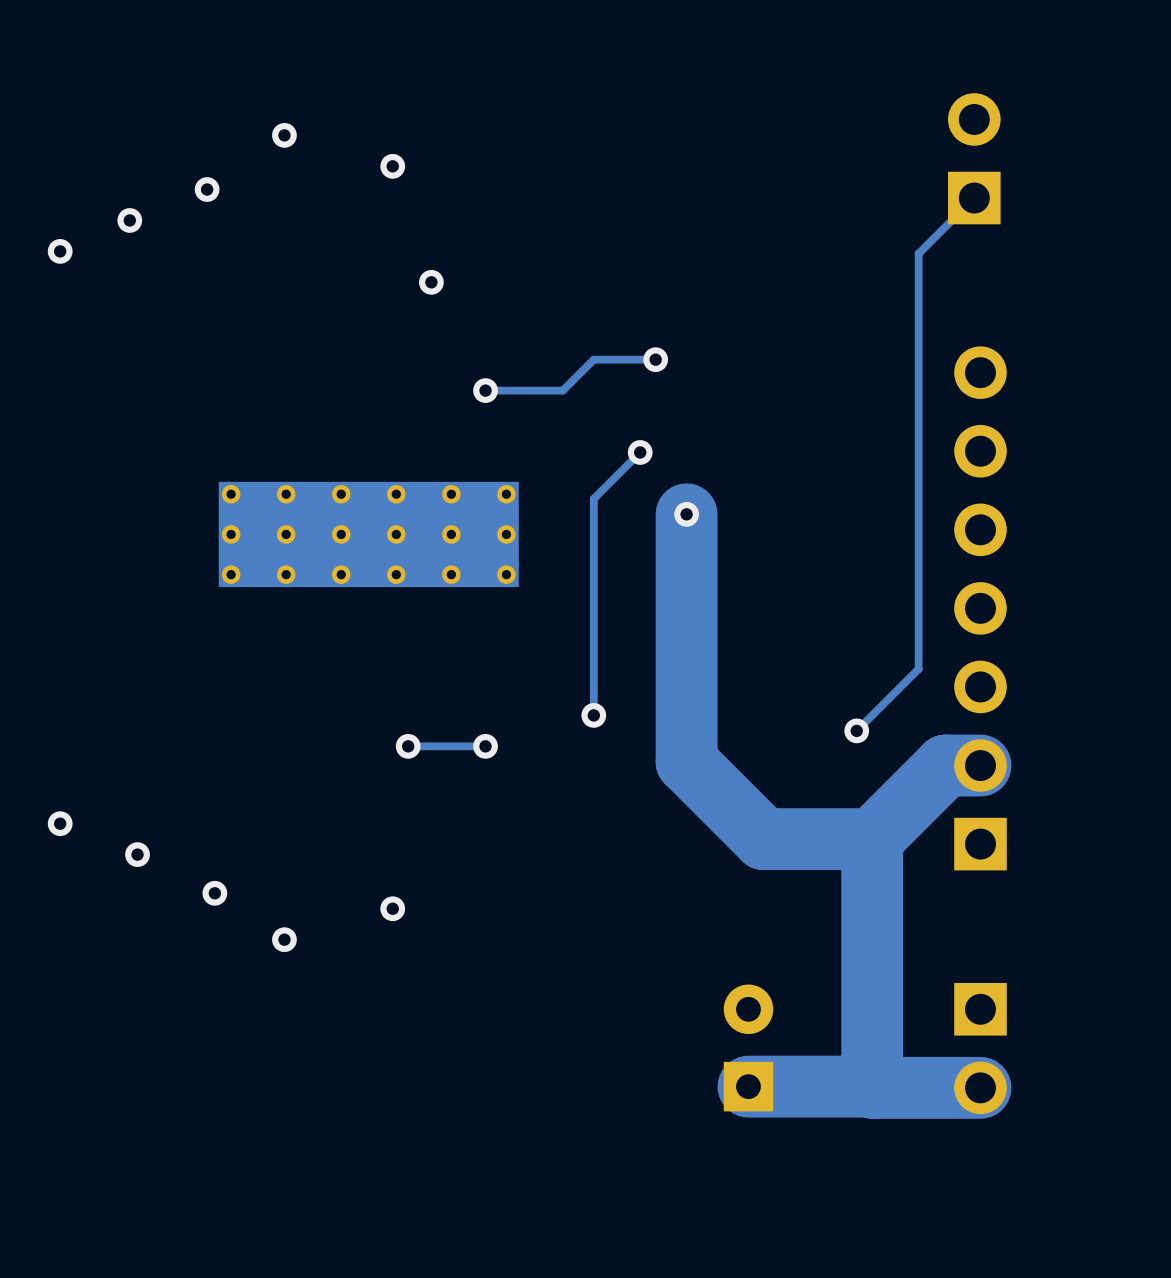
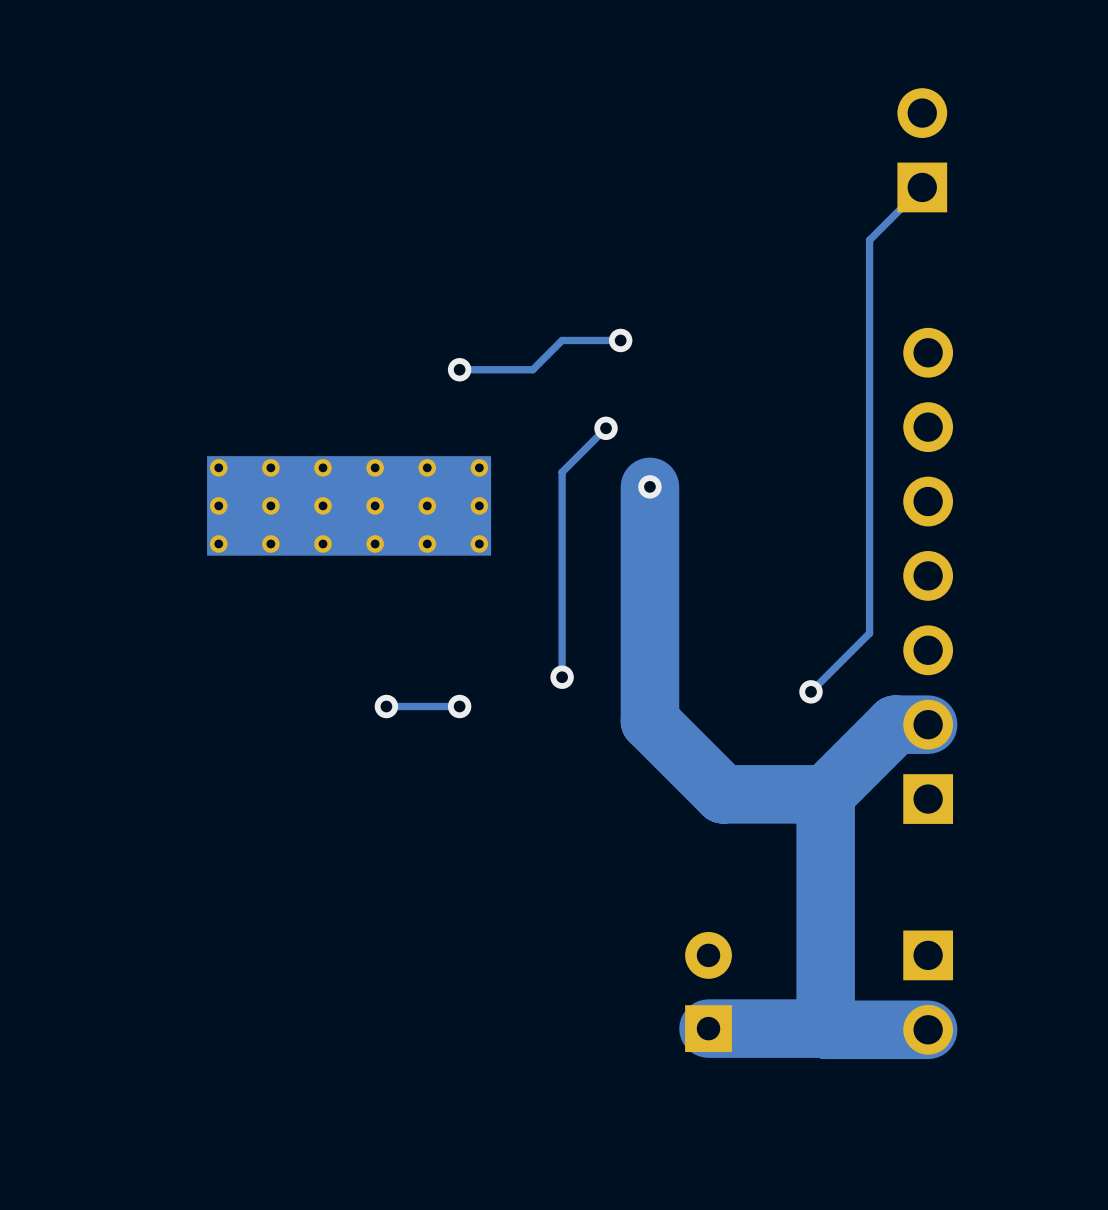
via: (284, 135) -> none
via: (392, 166) -> none
via: (207, 189) -> none
via: (129, 220) -> none
via: (60, 251) -> none
via: (431, 282) -> none
via: (60, 823) -> none
via: (137, 854) -> none
via: (214, 893) -> none
via: (392, 908) -> none
via: (284, 939) -> none

